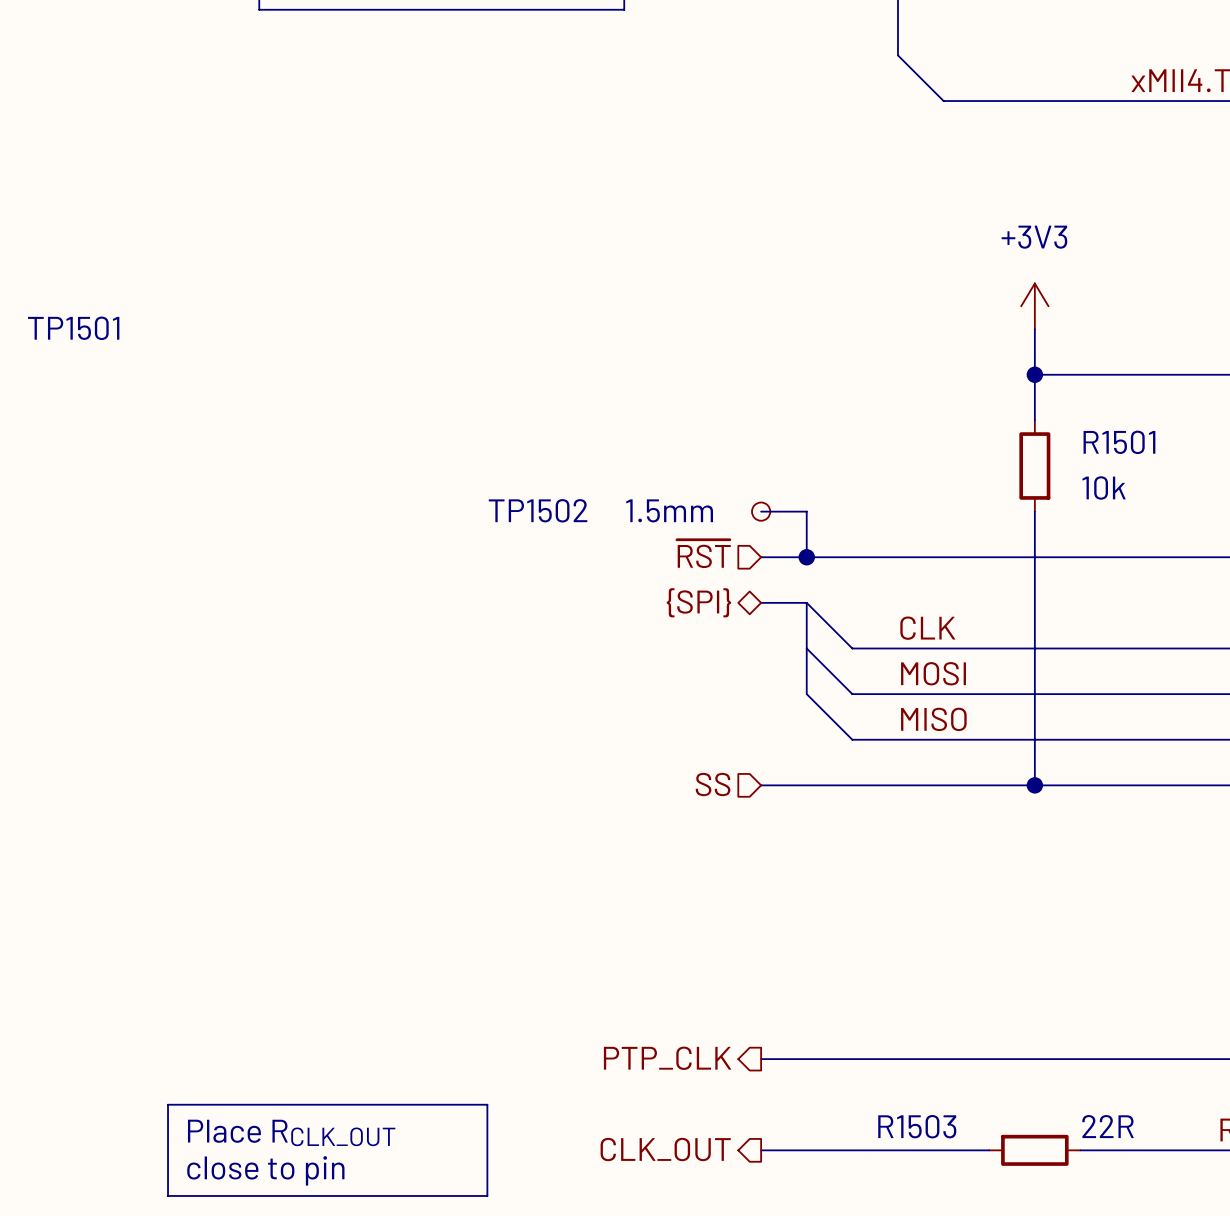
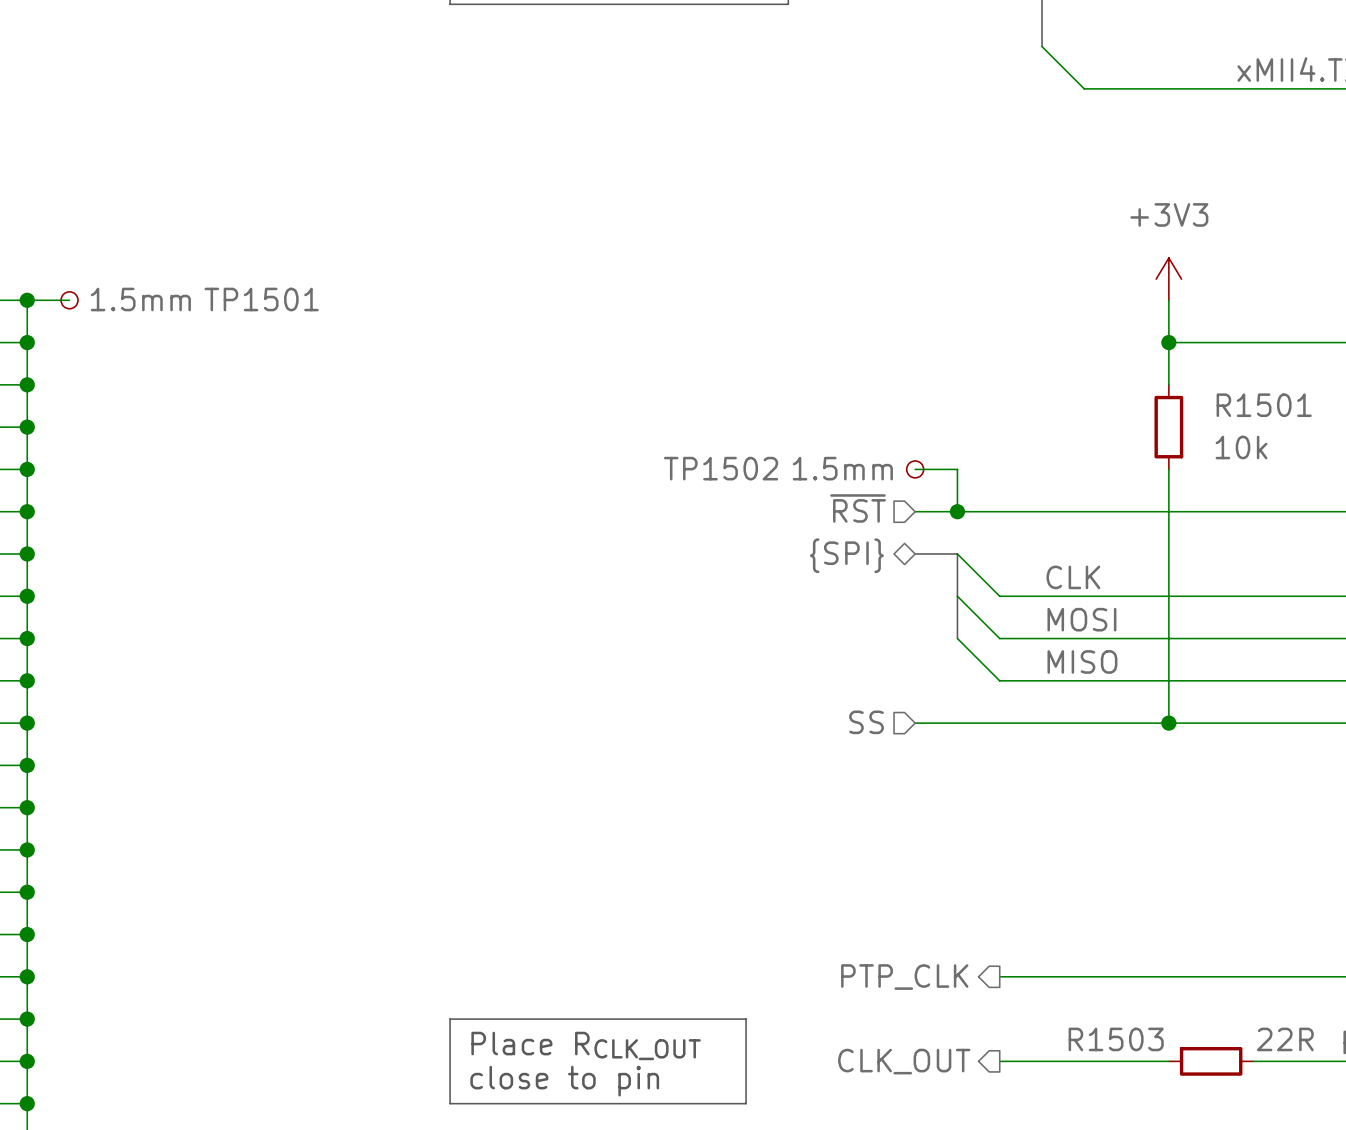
hierarchical label position: PTP_CLK (667, 1058) -> PTP_CLK (904, 977)
wire: (761, 1059) (852, 1059) -> none
line: (259, 1104) (168, 1104) (168, 1195) (259, 1195) -> (450, 1019) (450, 1103)
line: (487, 1104) (487, 1195) -> (661, 1019) (746, 1019) (746, 1103) (661, 1103)
text position: Place RCLK_OUT (291, 1132) -> Place RCLK_OUT (586, 1045)
hierarchical label position: CLK_OUT (665, 1149) -> CLK_OUT (904, 1061)
wire: (761, 1150) (852, 1150) -> none
R1503 position: (1034, 1150) -> (1211, 1061)
wire: (1080, 1150) (1126, 1150) -> (1126, 1061) (1168, 1061)
text position: close to pin (265, 1170) -> close to pin (564, 1081)

